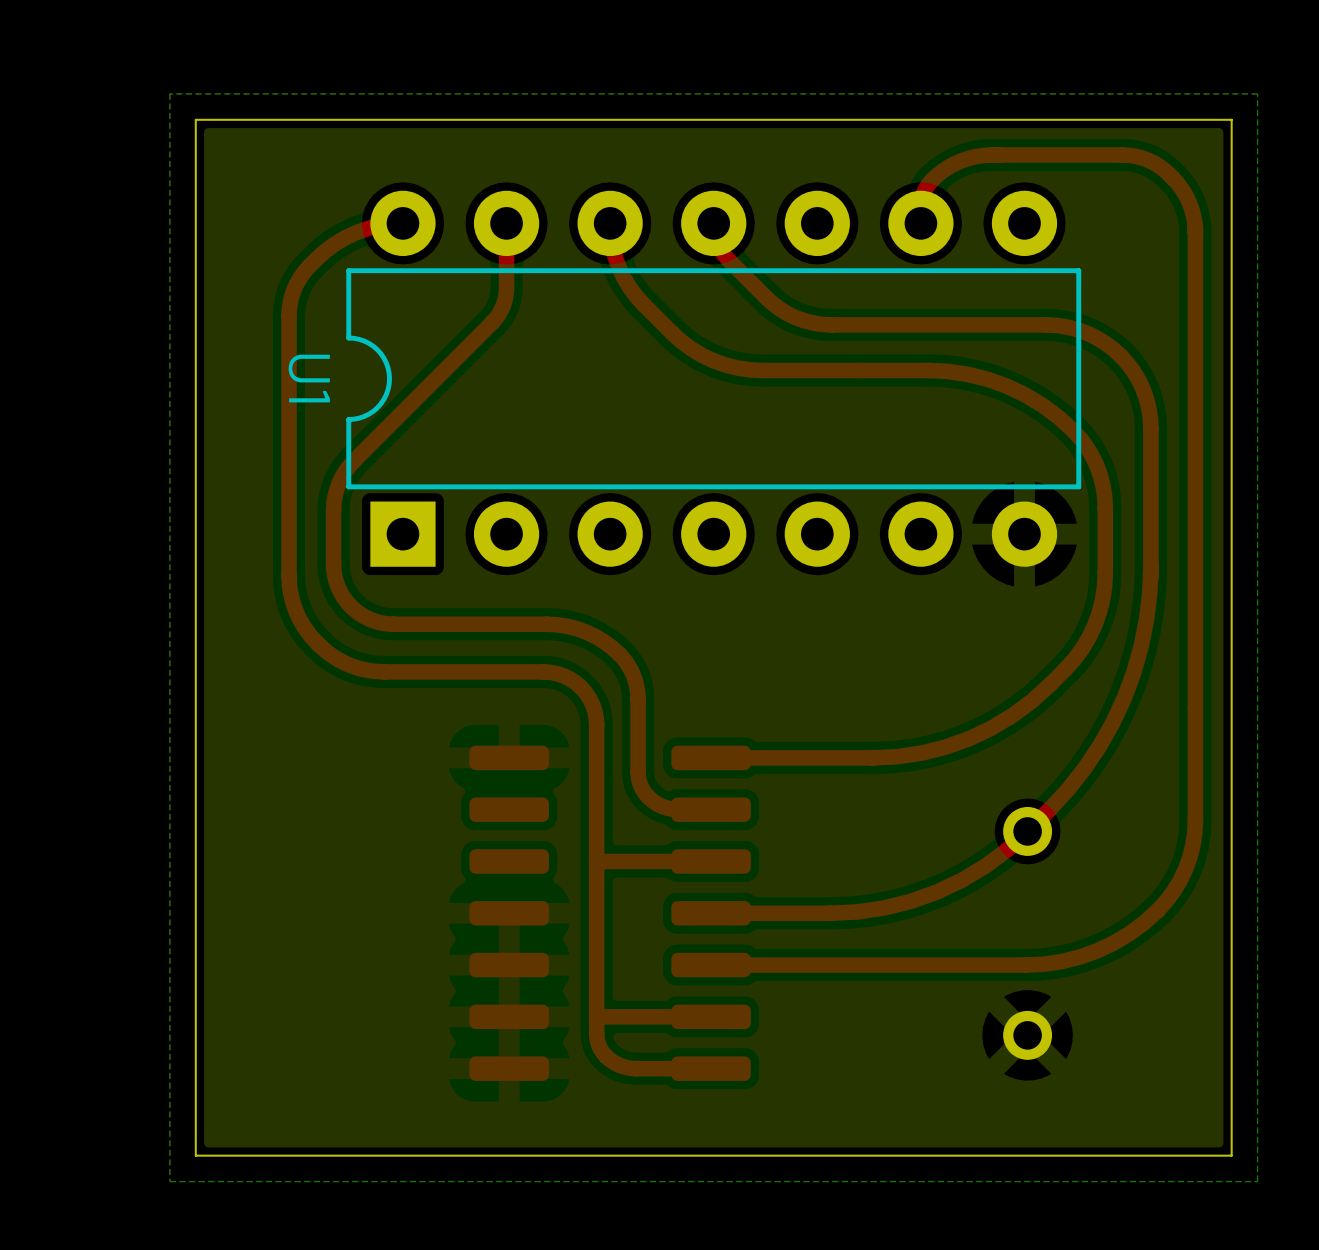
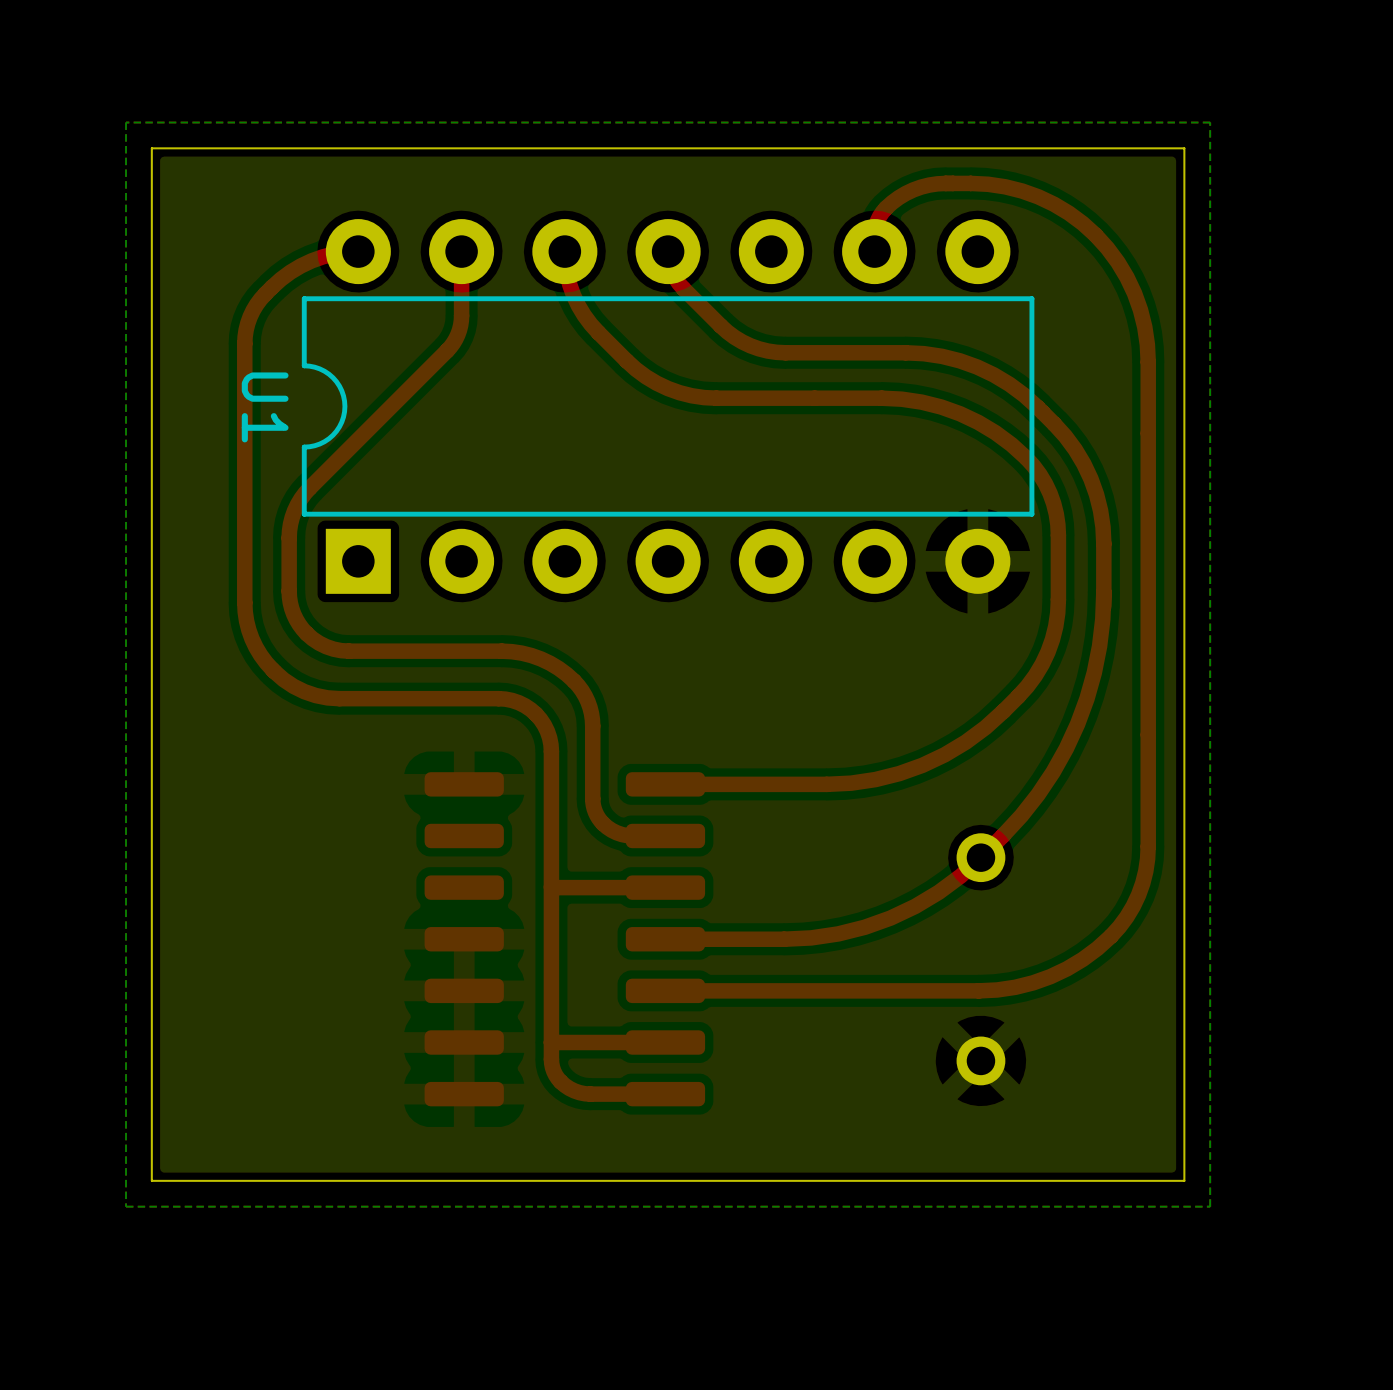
top track: (1017, 155) (1122, 155) (1147, 160) (1164, 169) (1182, 189) (1192, 210) (1195, 232) -> (970, 183) (1005, 186) (1038, 196) (1068, 213) (1095, 235) (1117, 262) (1134, 293) (1144, 327) (1148, 362)
top track: (1195, 226) (1195, 334) -> none
top track: (951, 324) (1045, 324) (1066, 326) (1095, 337) (1120, 355) (1138, 380) (1148, 408) (1150, 428) (1150, 516) -> (905, 352) (942, 356) (977, 367) (1009, 384) (1037, 407) (1065, 436) (1083, 463) (1090, 478) (1100, 510) (1103, 543)

